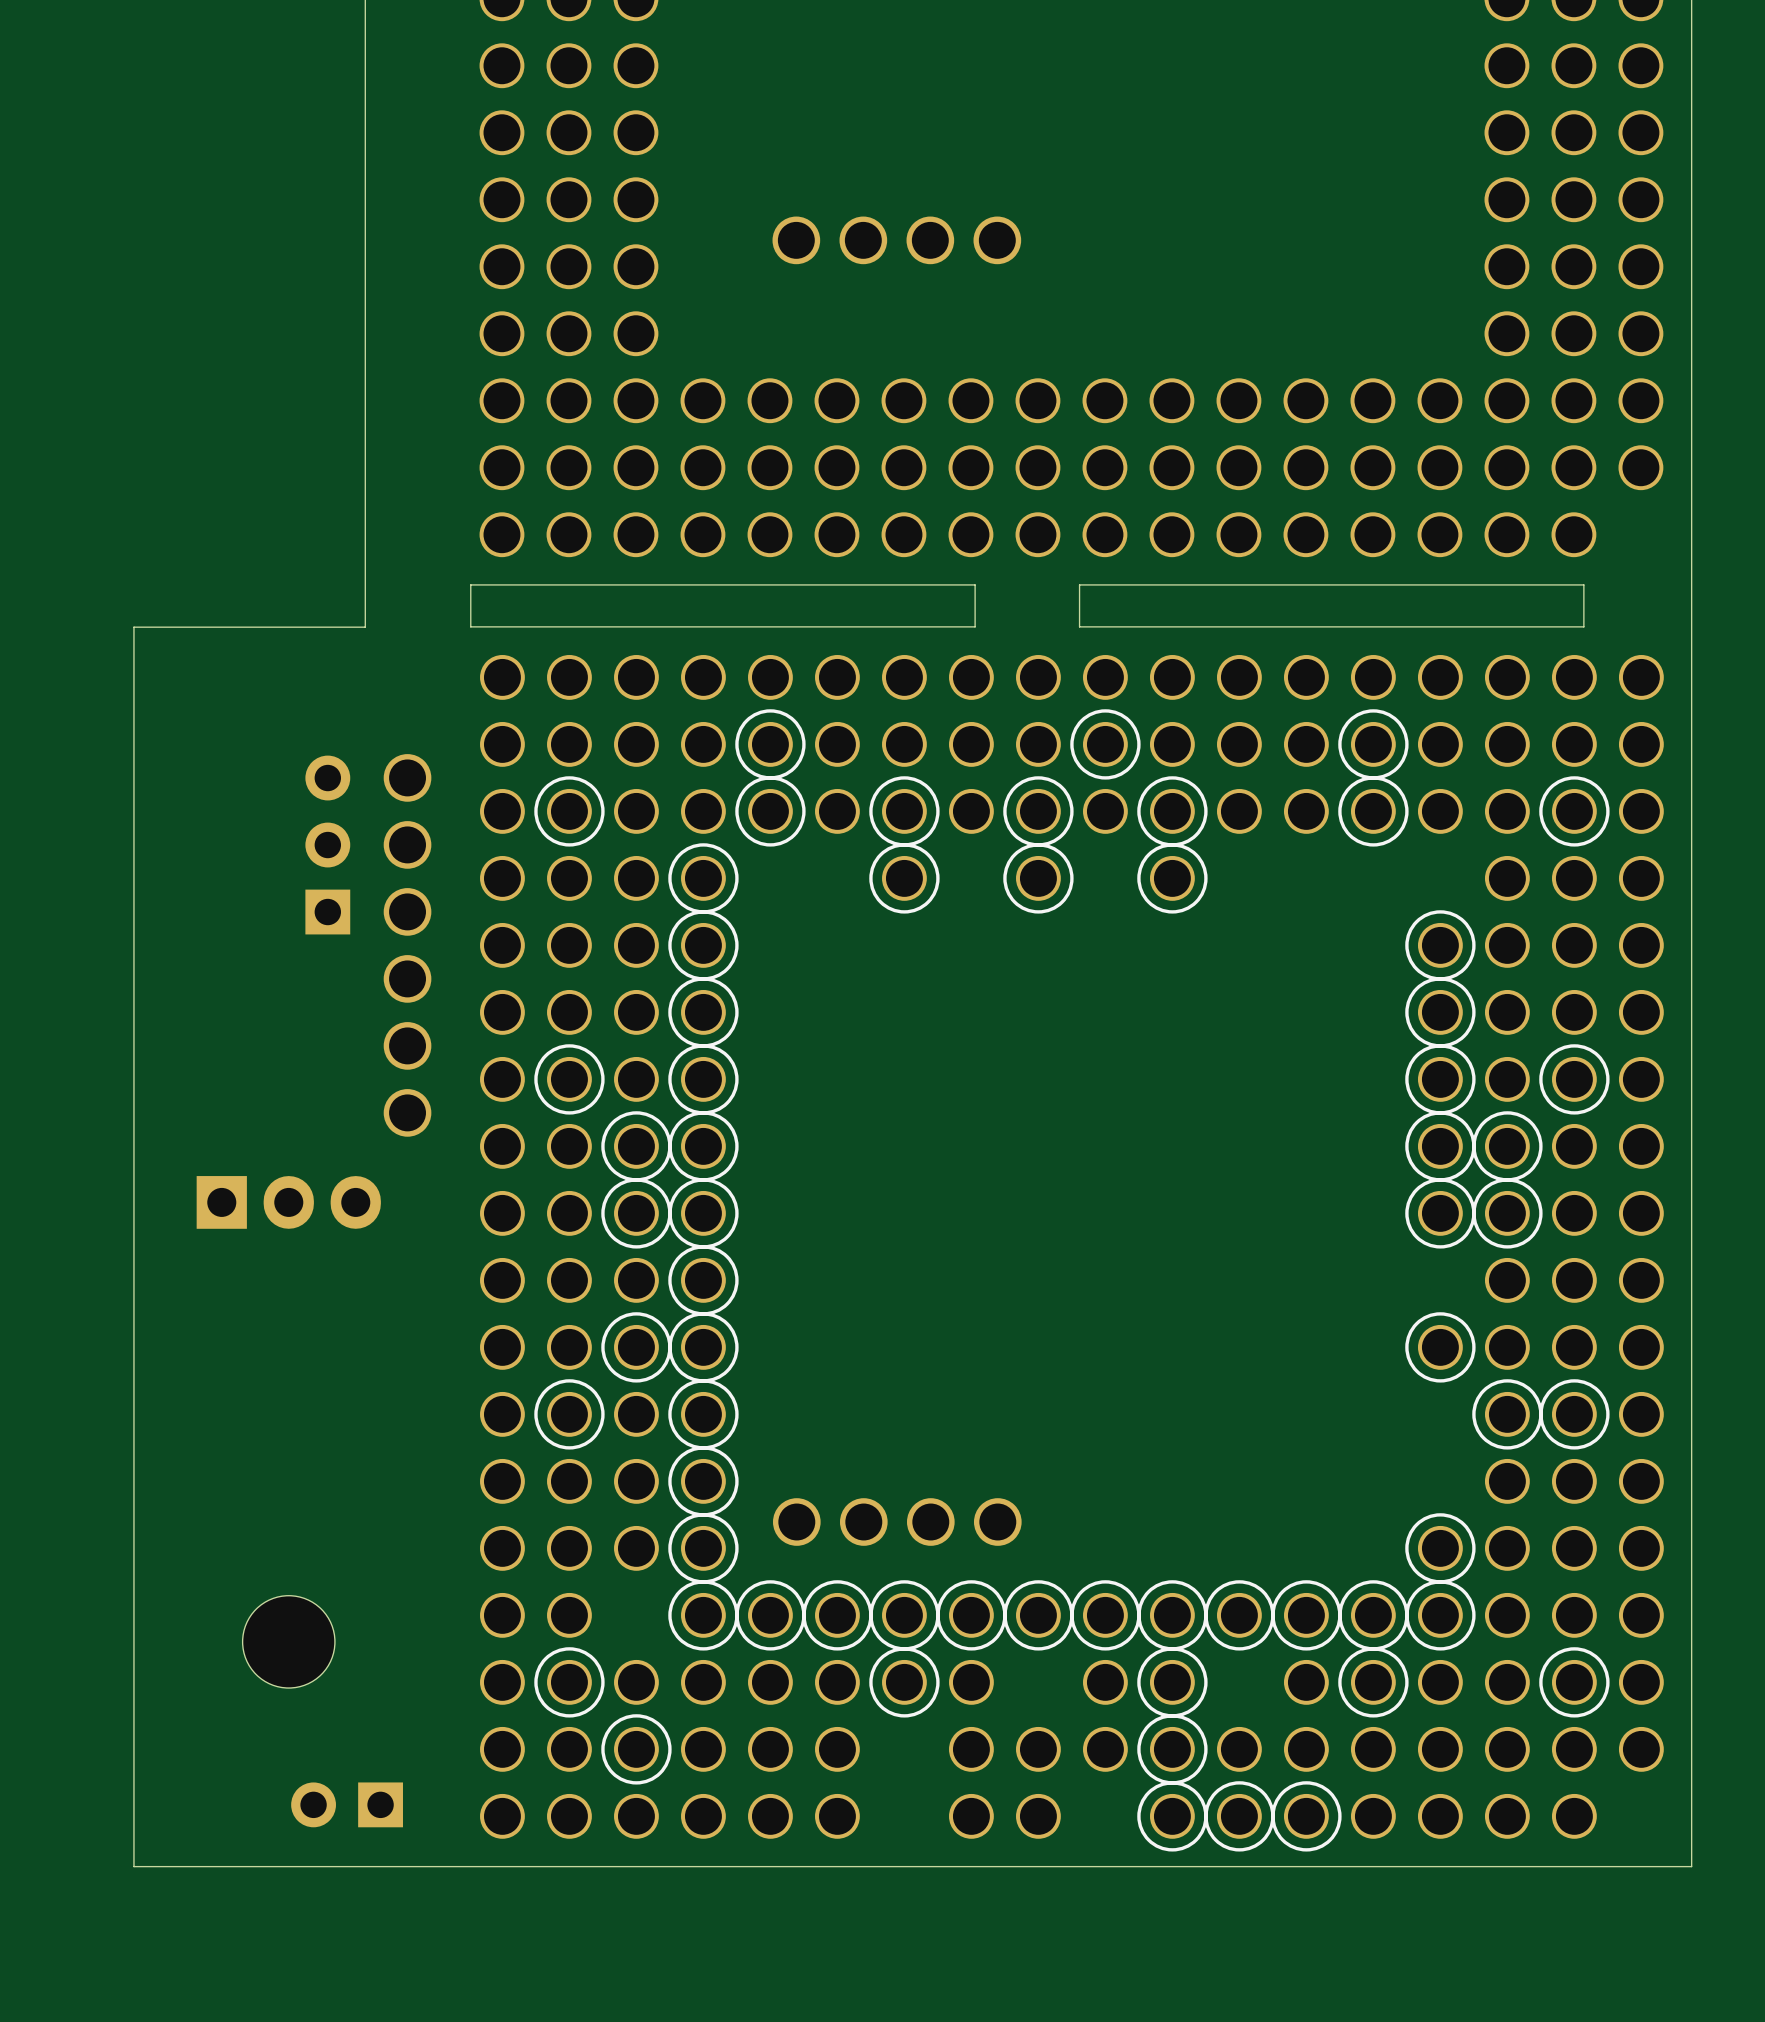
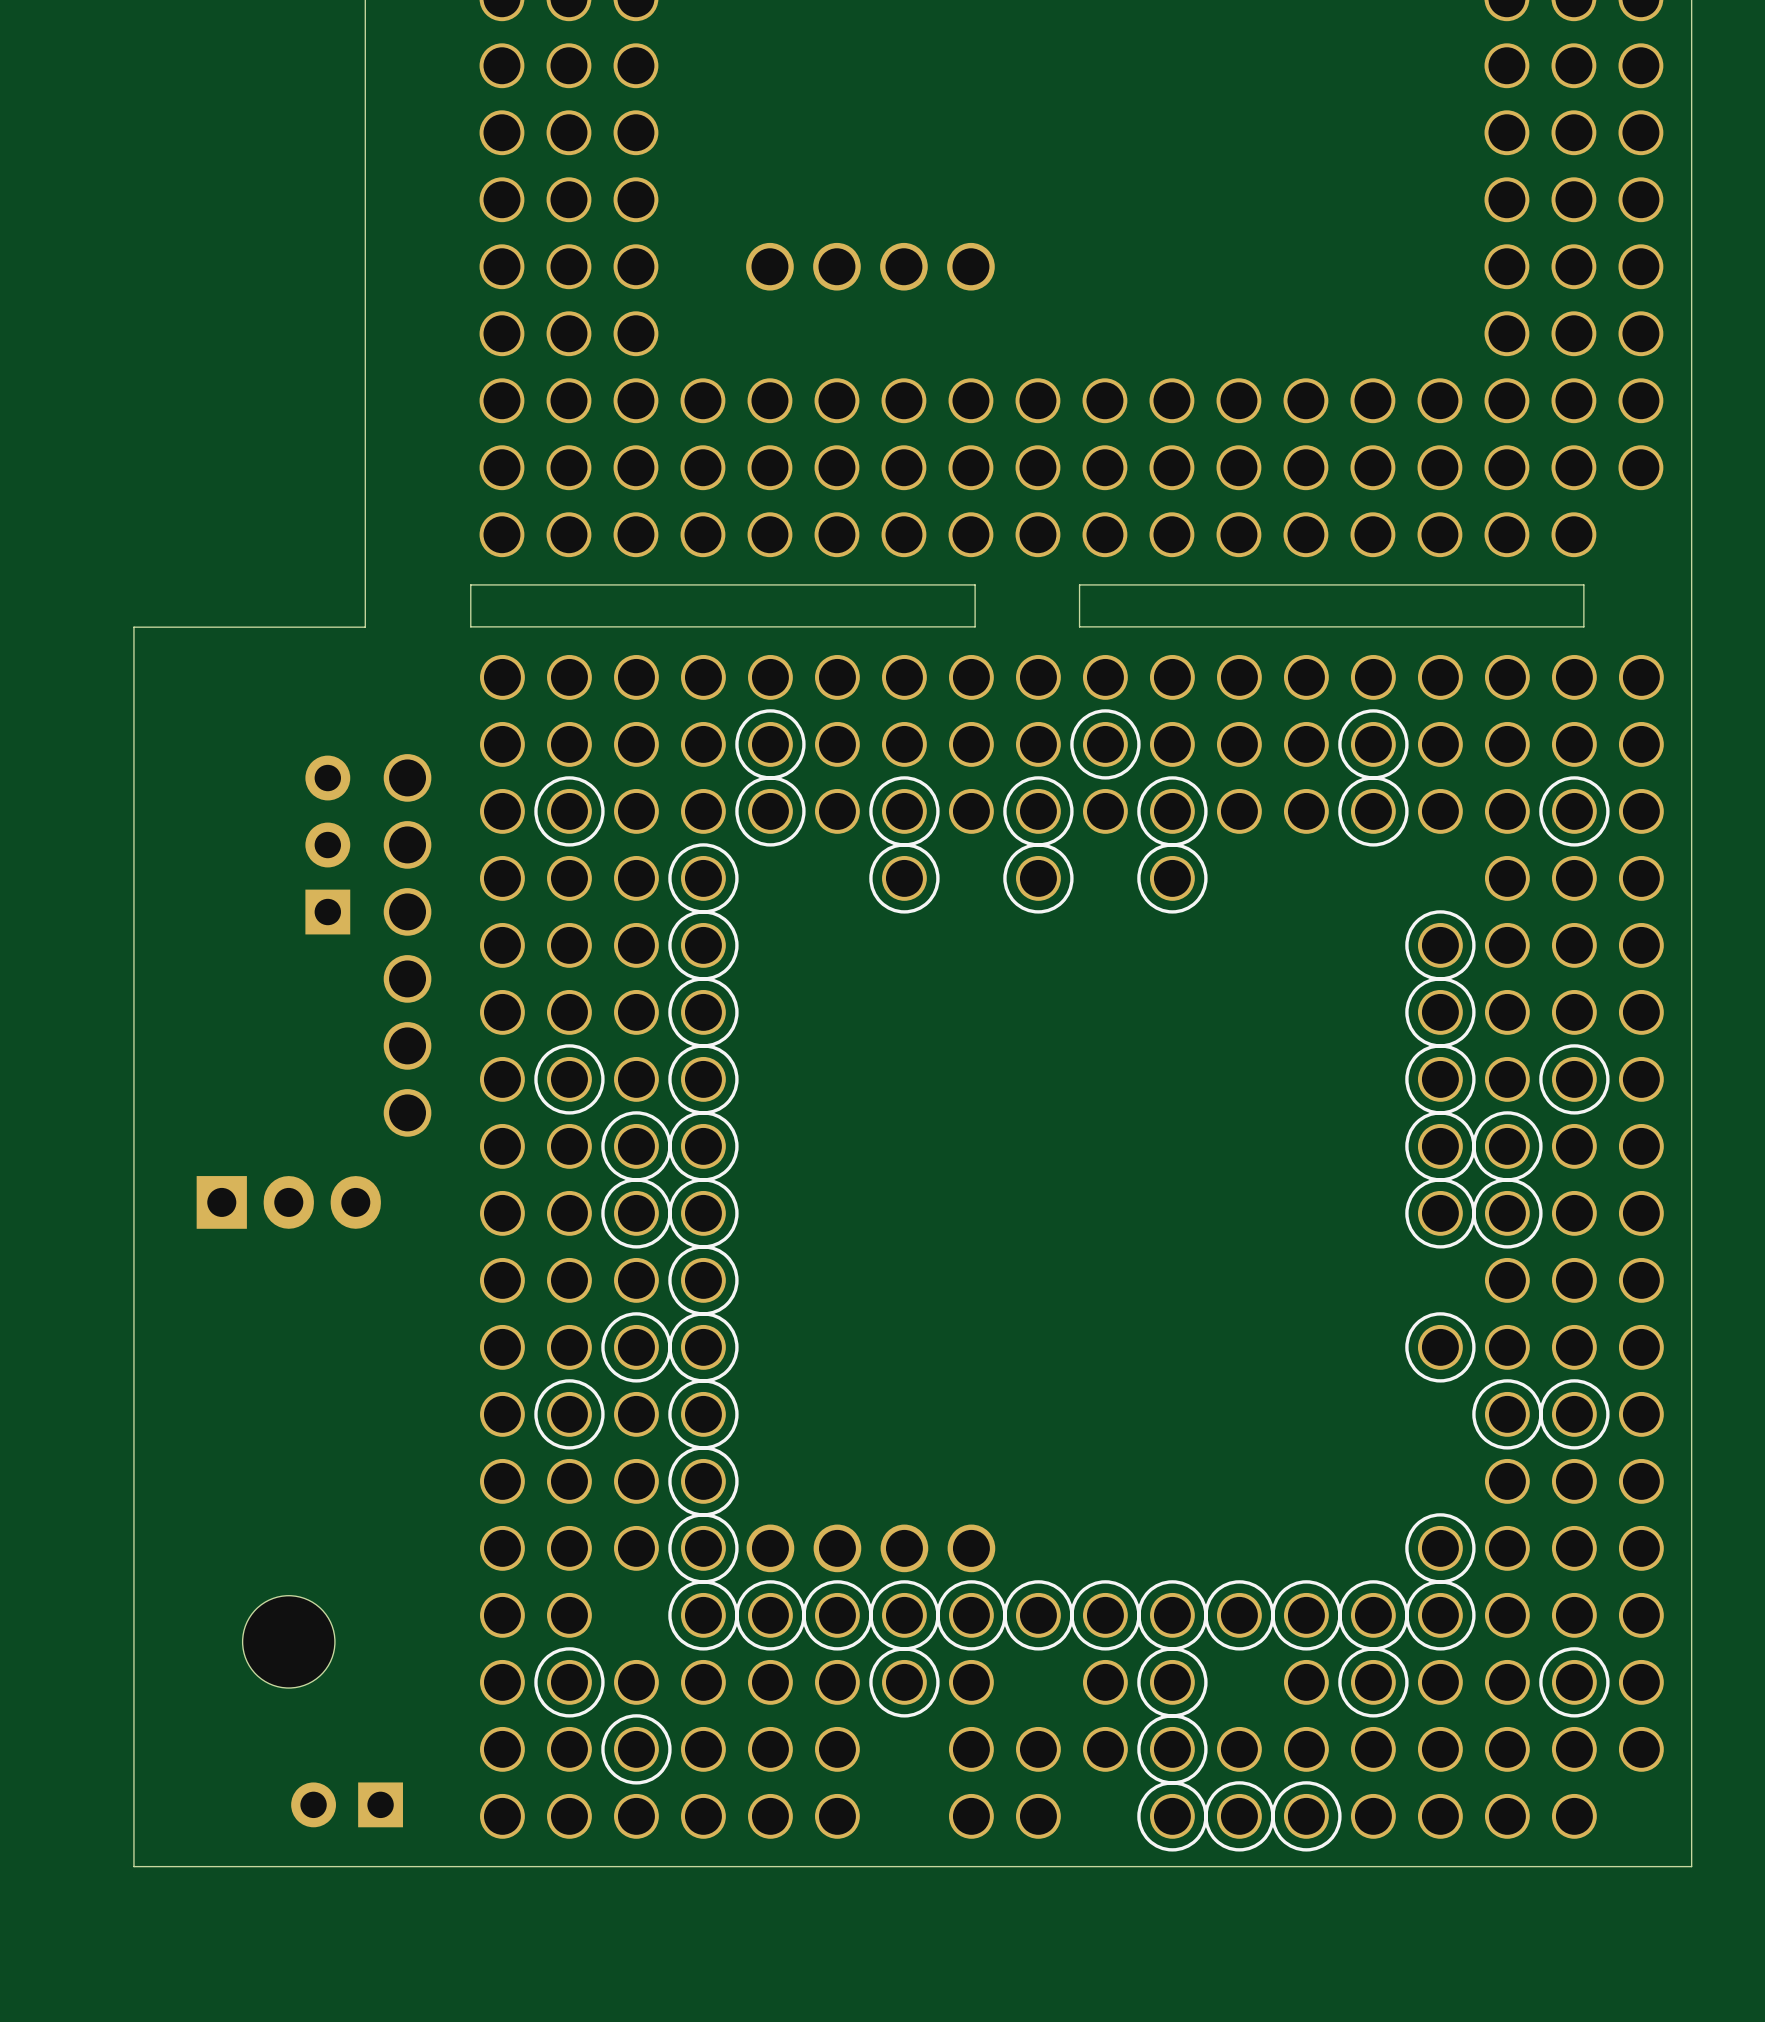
part position: (896, 240) -> (870, 266)
part position: (897, 1522) -> (870, 1548)

